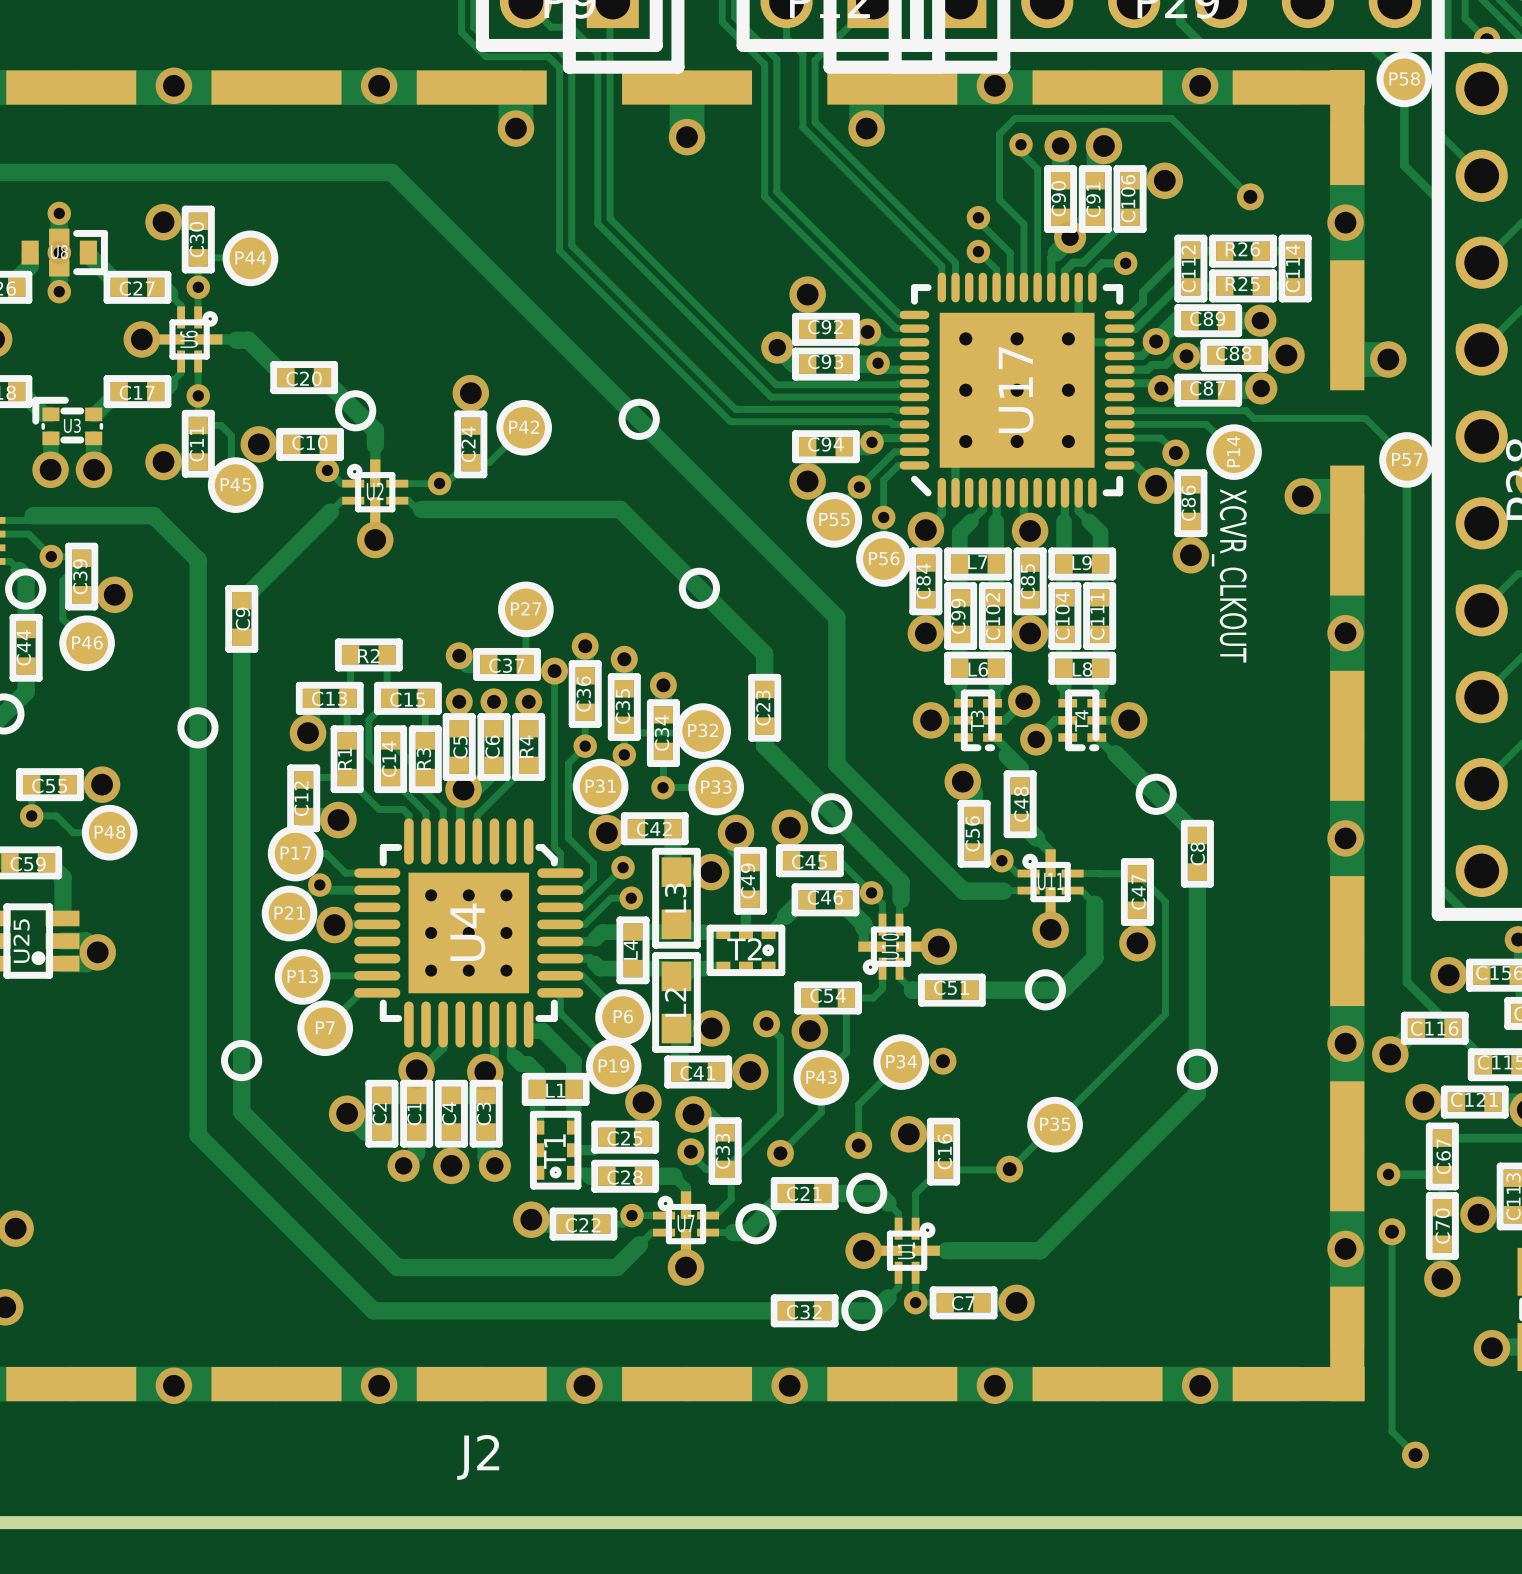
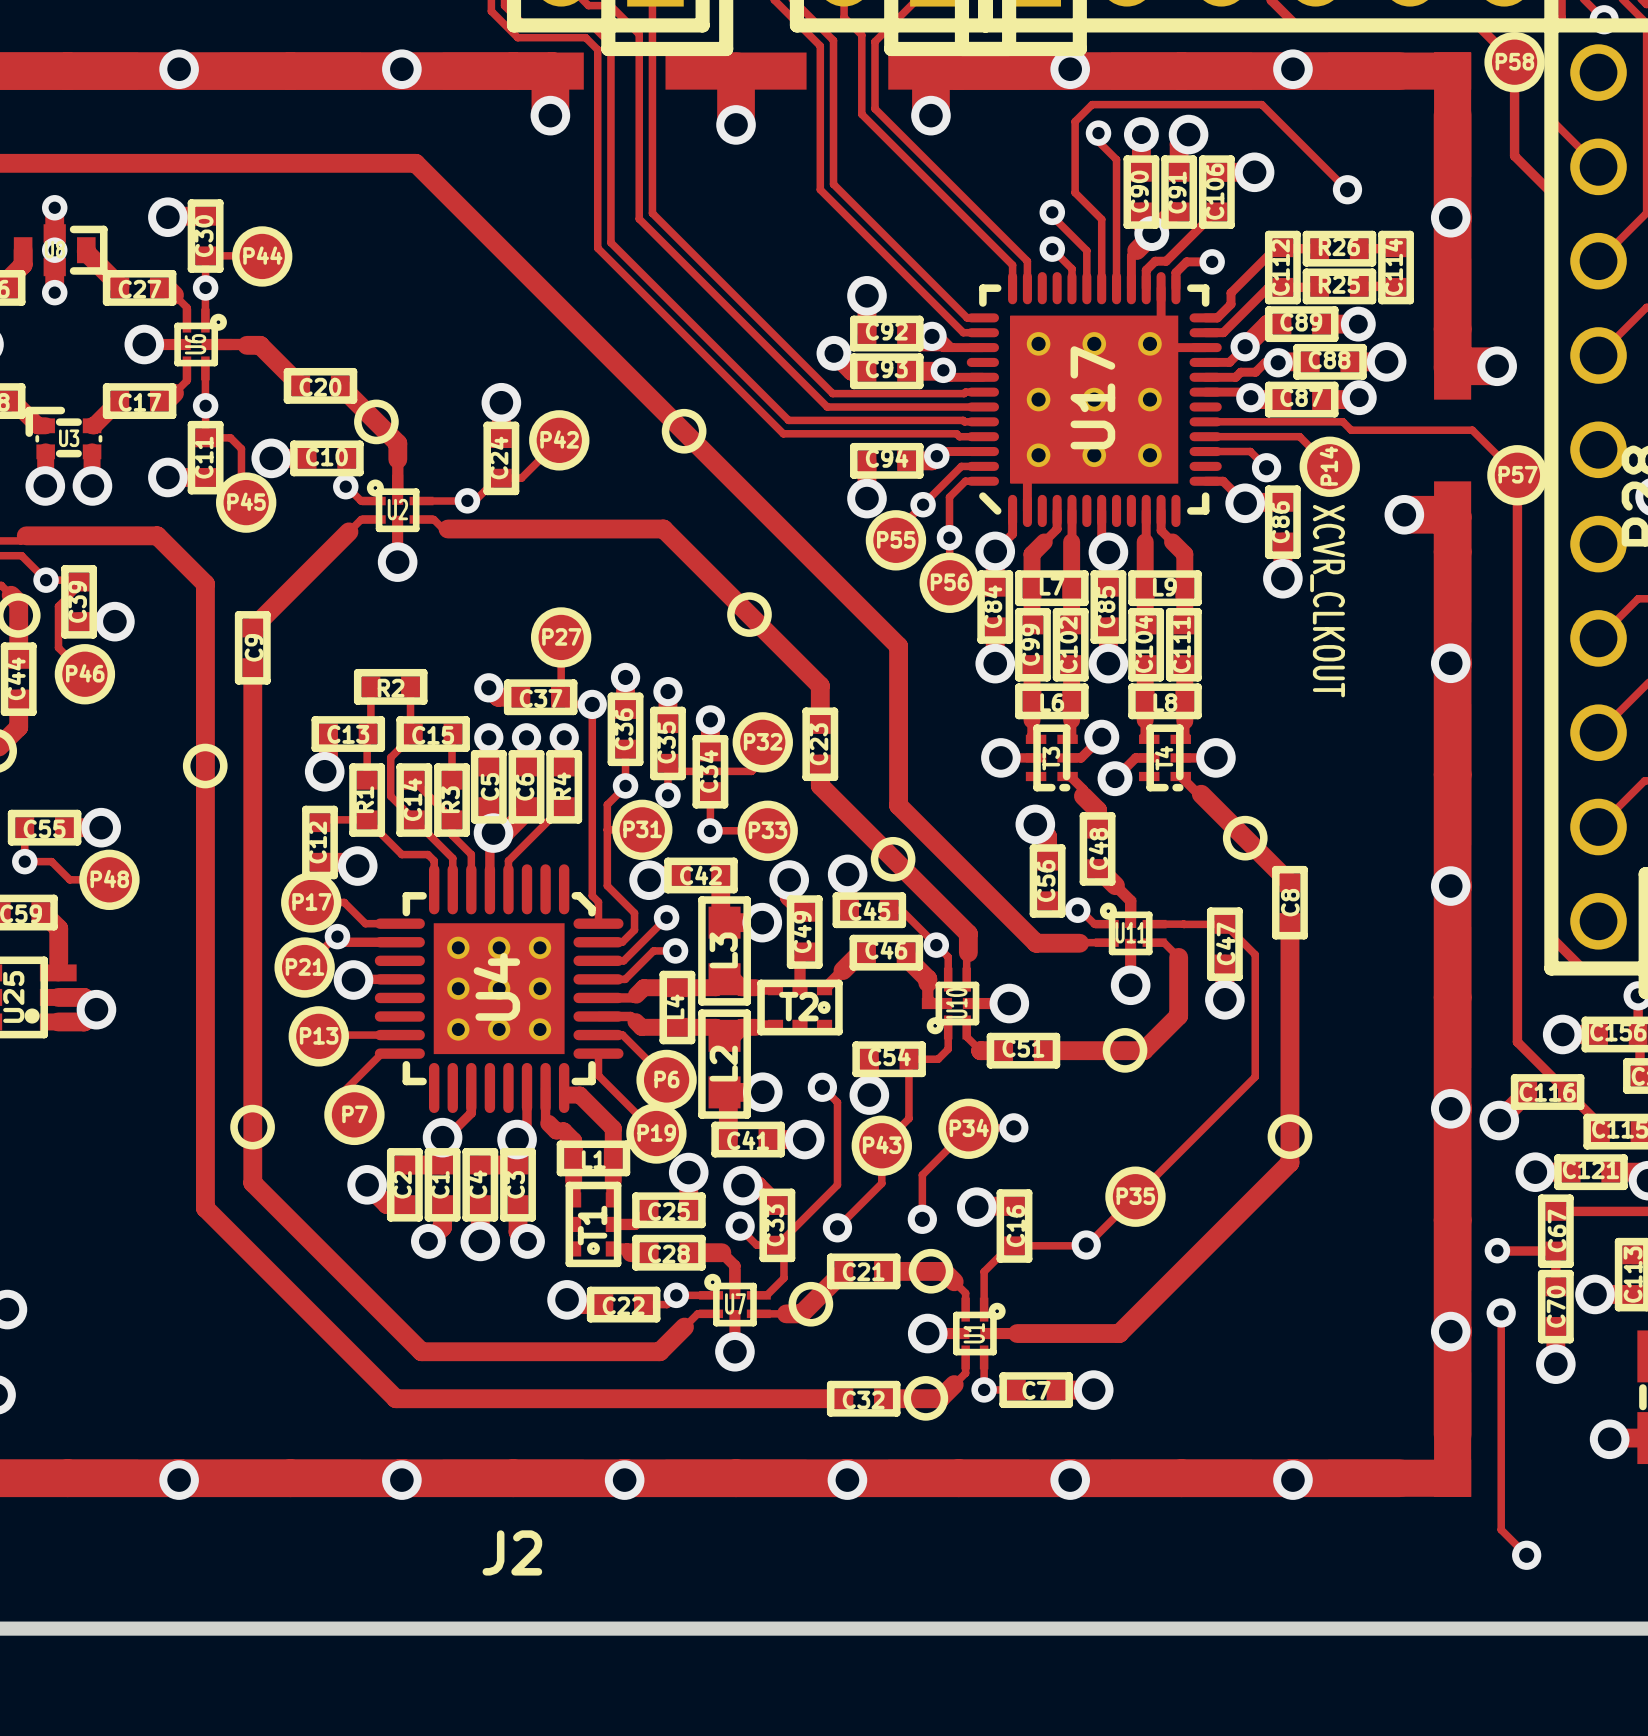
P32 position: (703, 731) -> (762, 742)
P7 position: (325, 1028) -> (354, 1114)

